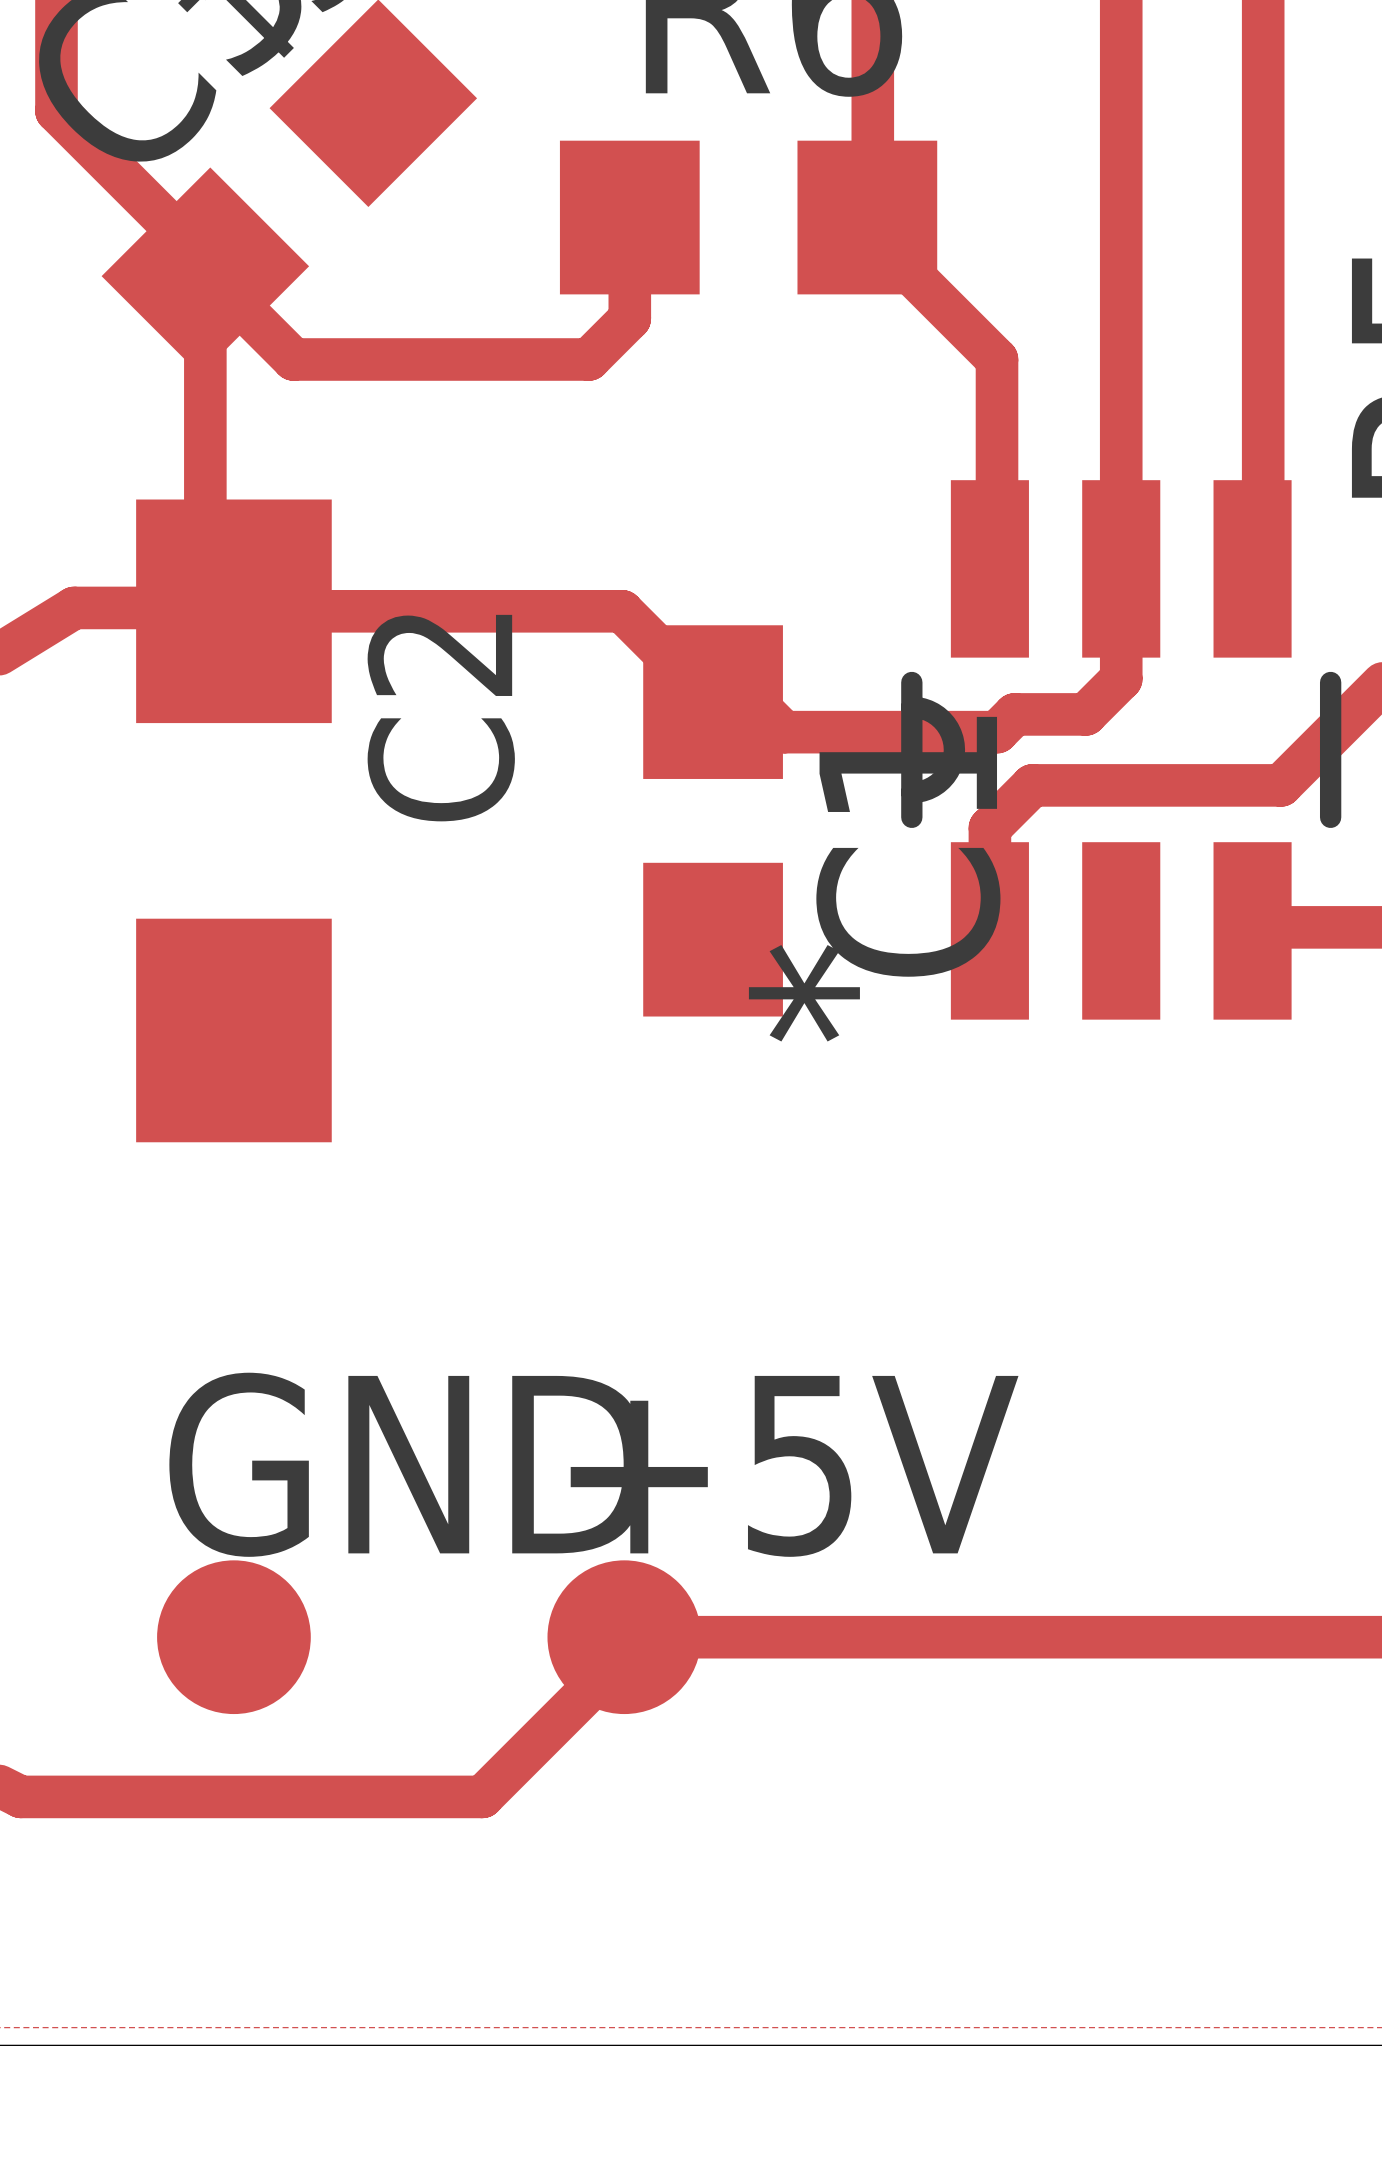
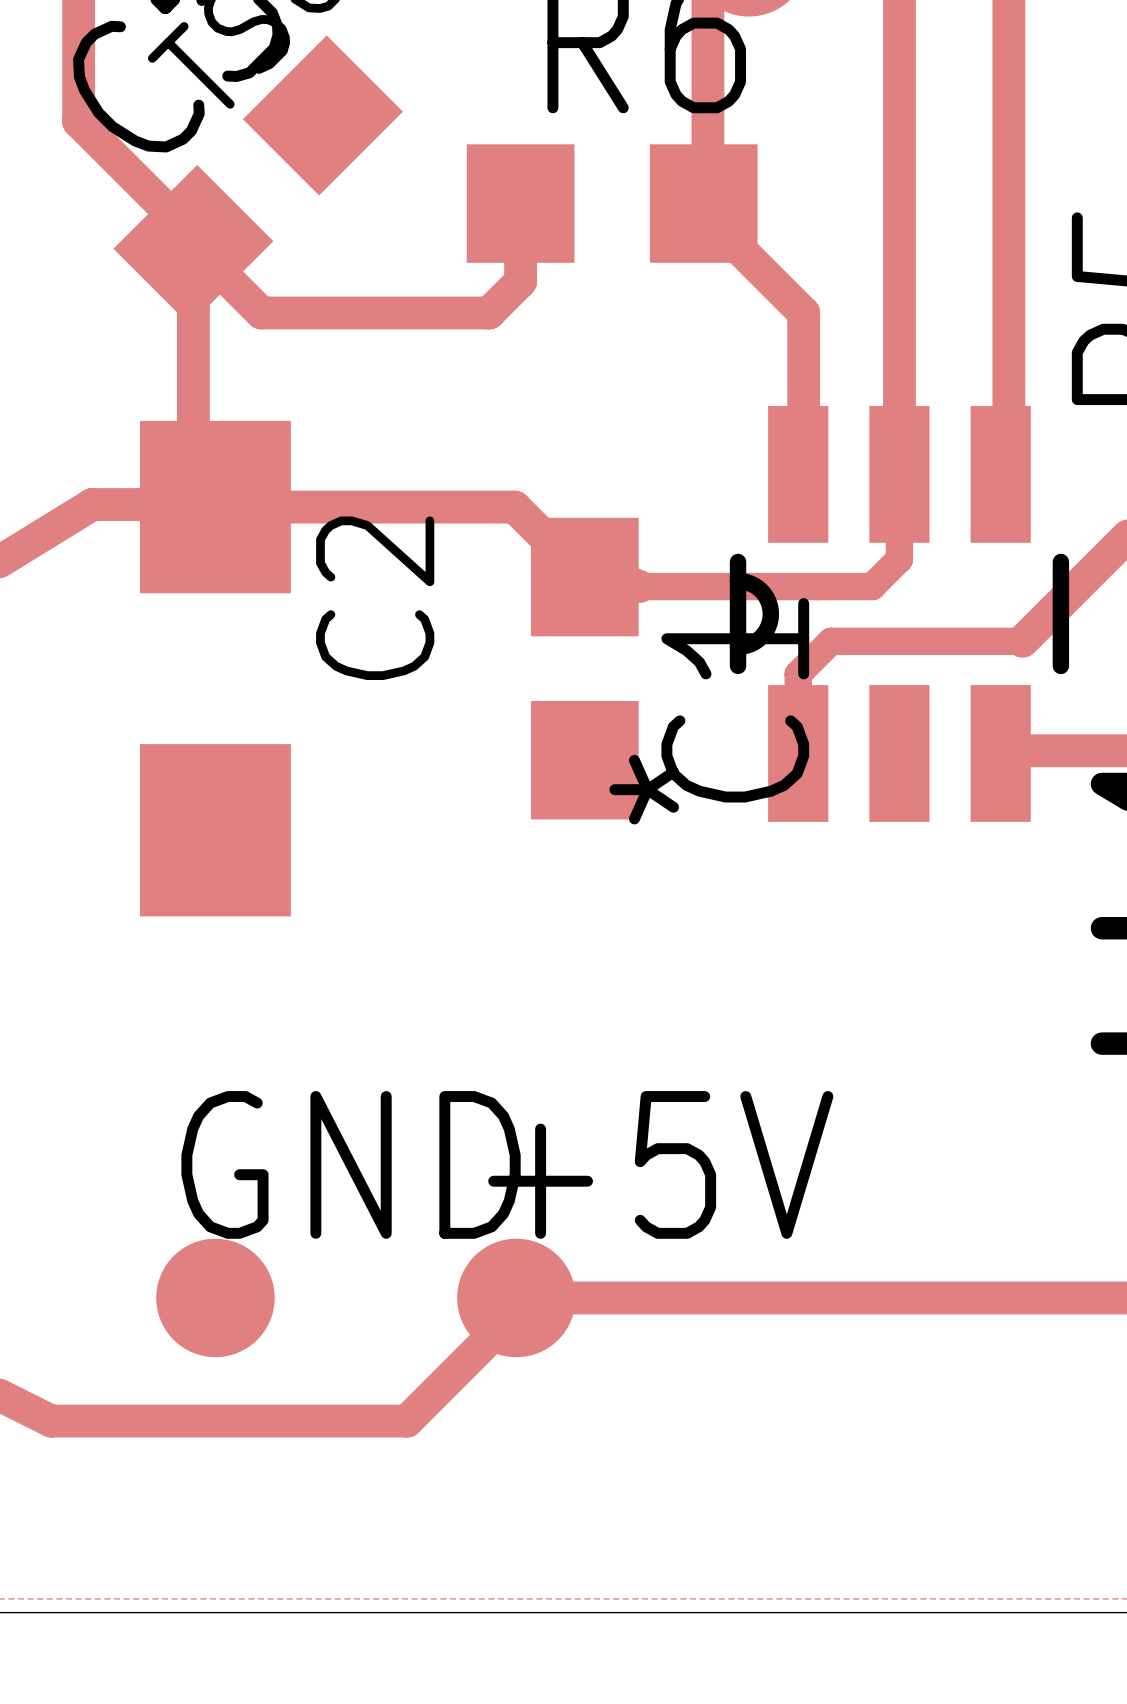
track width: thick (1121, 568) (1121, 678) (1085, 714) (1014, 714) -> thin (899, 474) (899, 559) (872, 586) (817, 586)
track: (754, 702) (784, 732) (997, 732) (1014, 714) -> (616, 577) (639, 586) (817, 586)
track width: thick (1280, 785) (1032, 785) (989, 827) (989, 930) -> thin (1022, 641) (831, 641) (798, 674) (798, 753)

